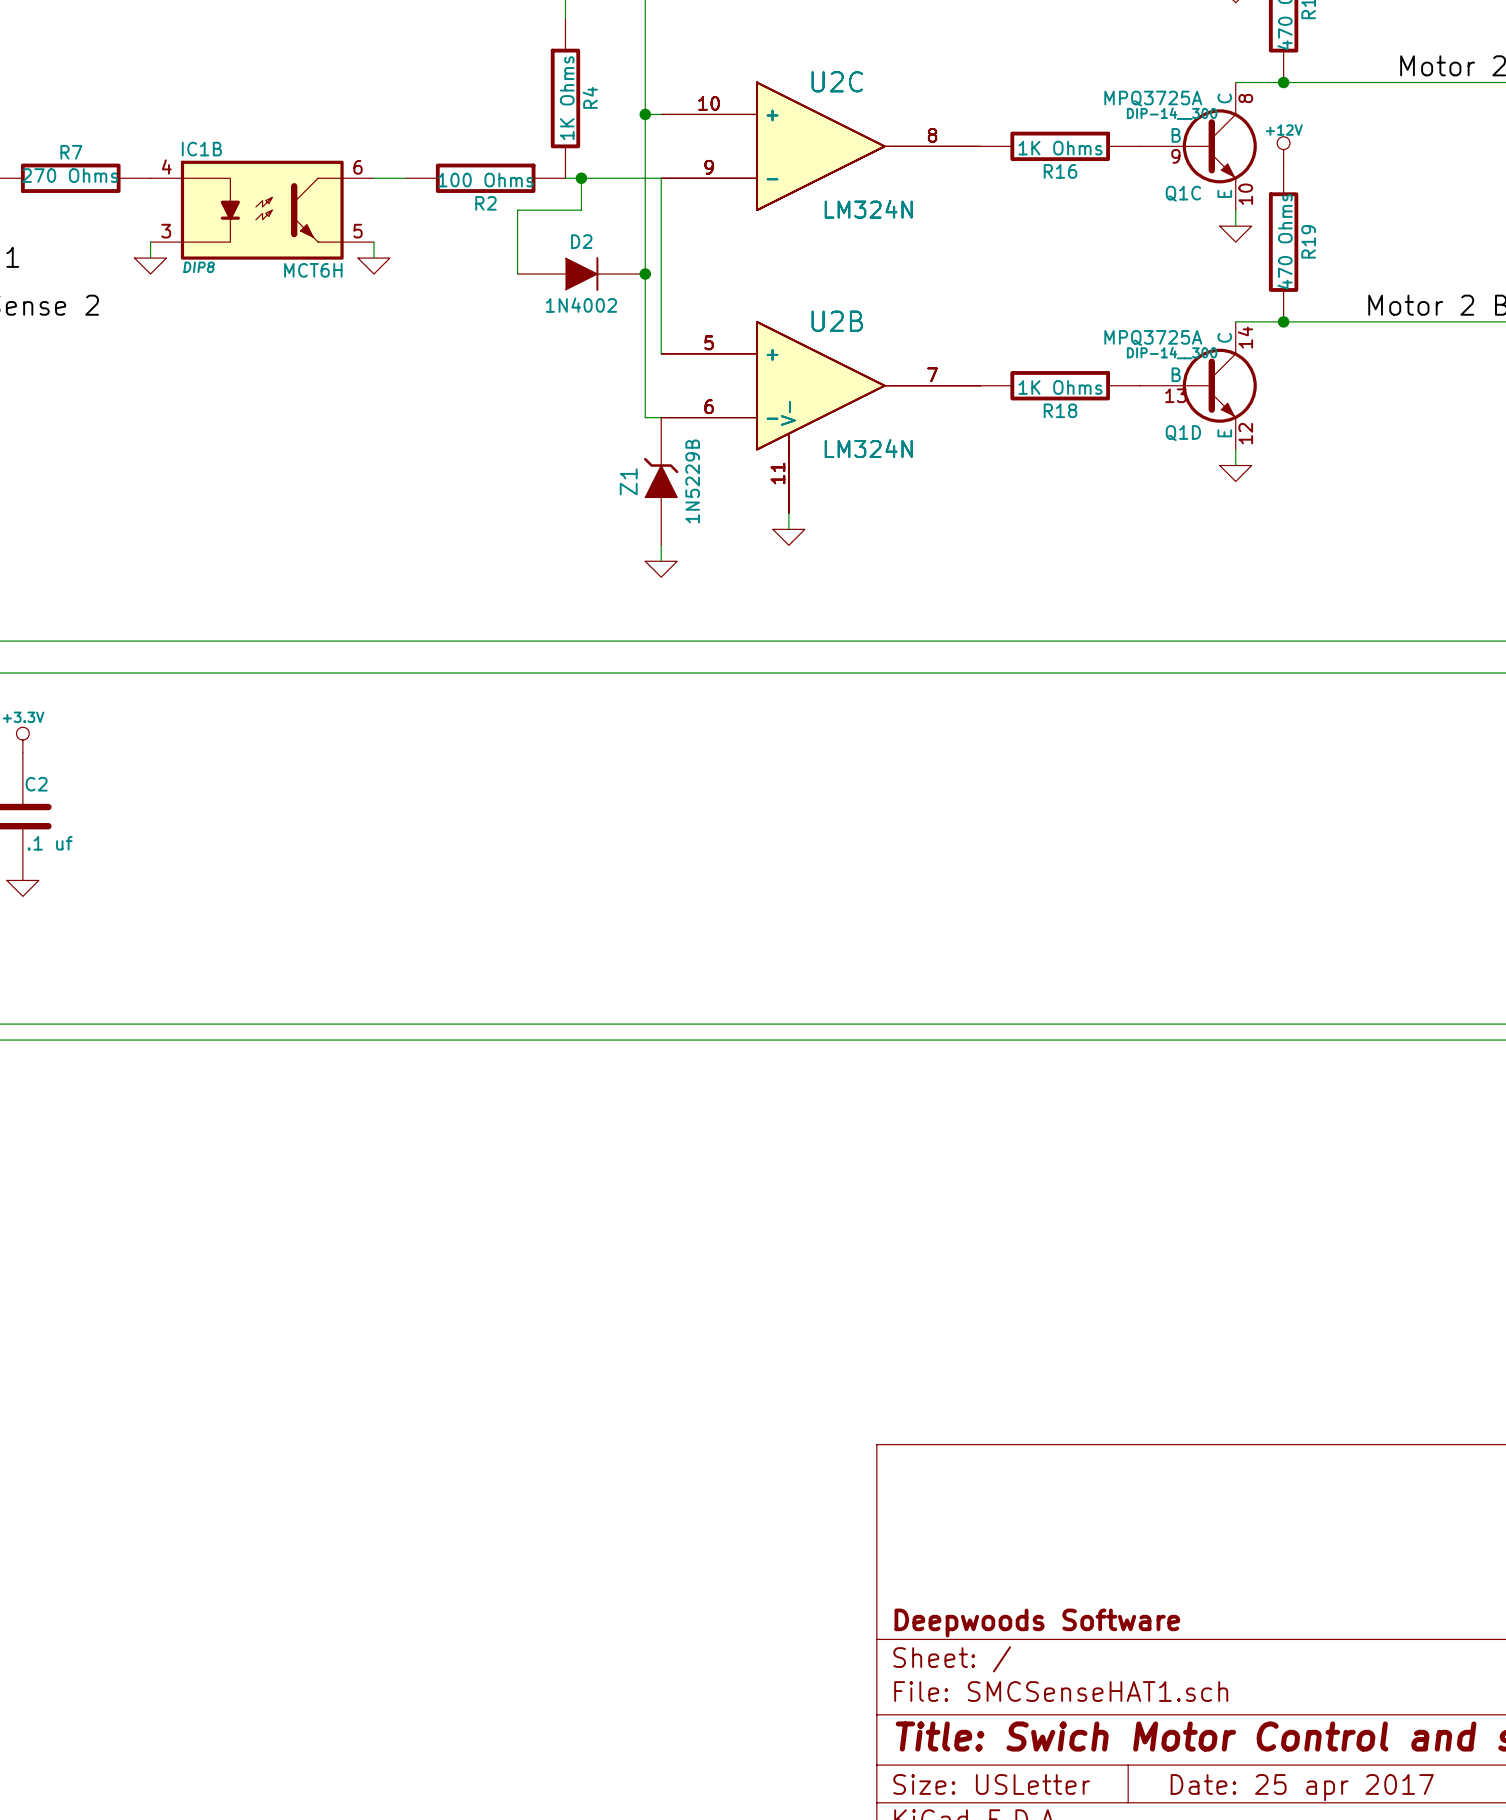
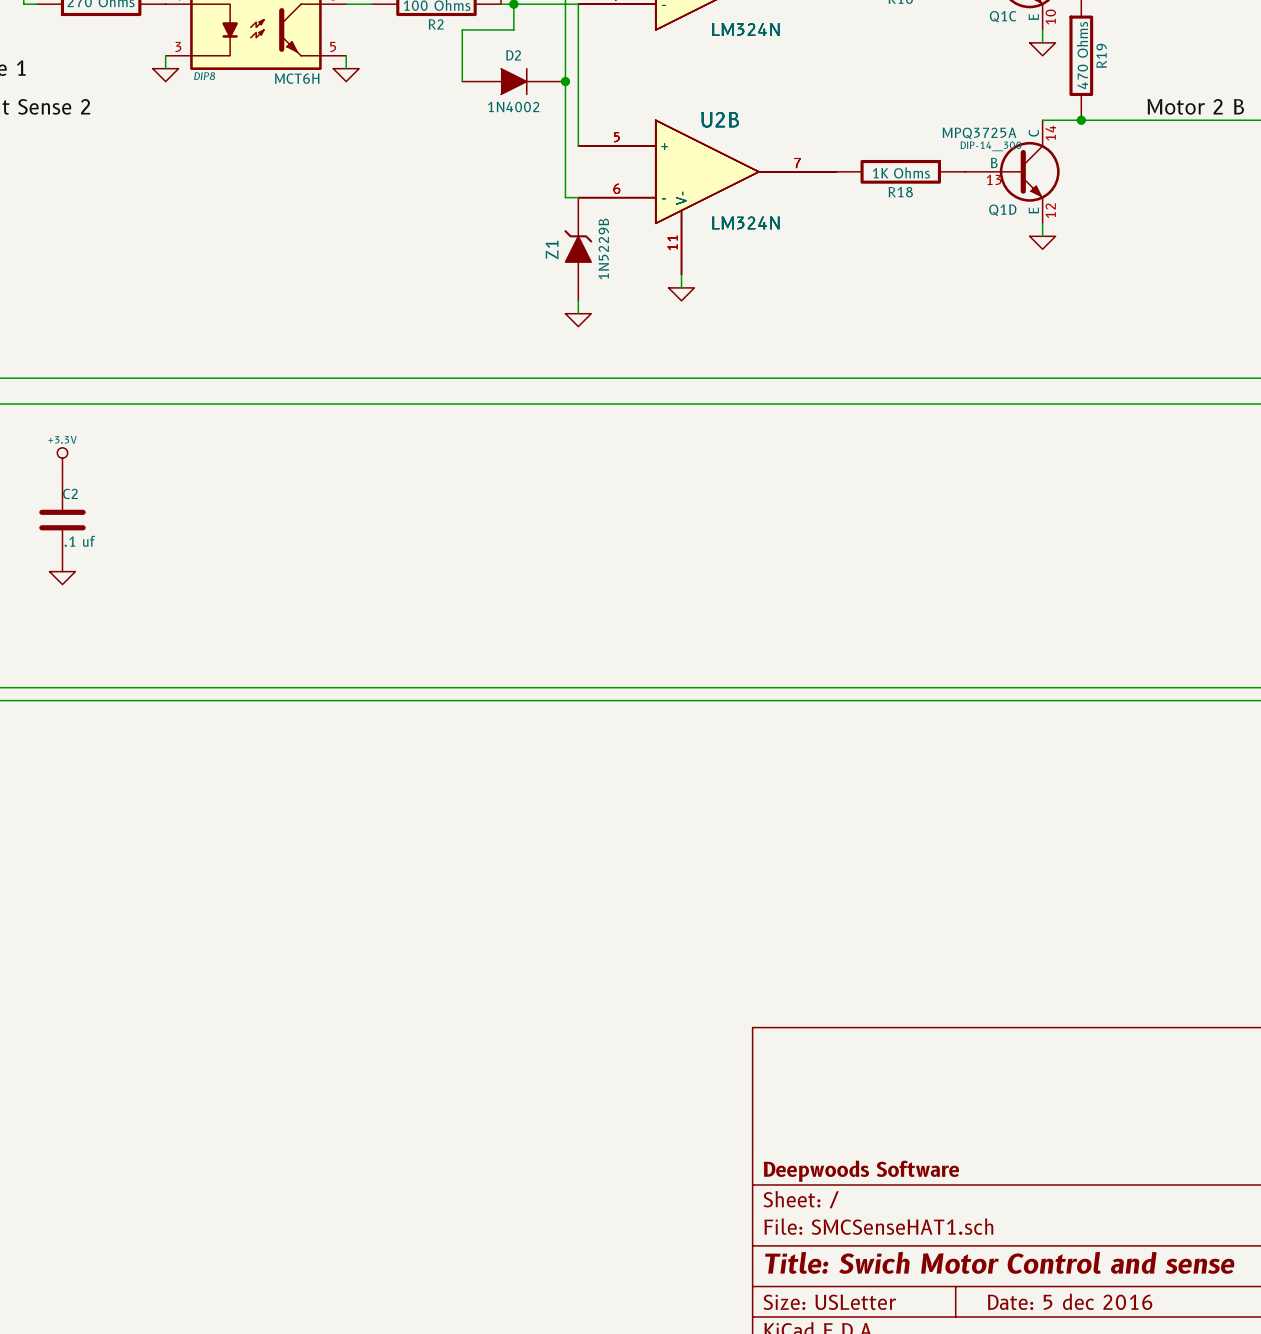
title block: Date: 25 apr 2017 (1302, 1787) -> Date: 5 dec 2016 (1070, 1301)

